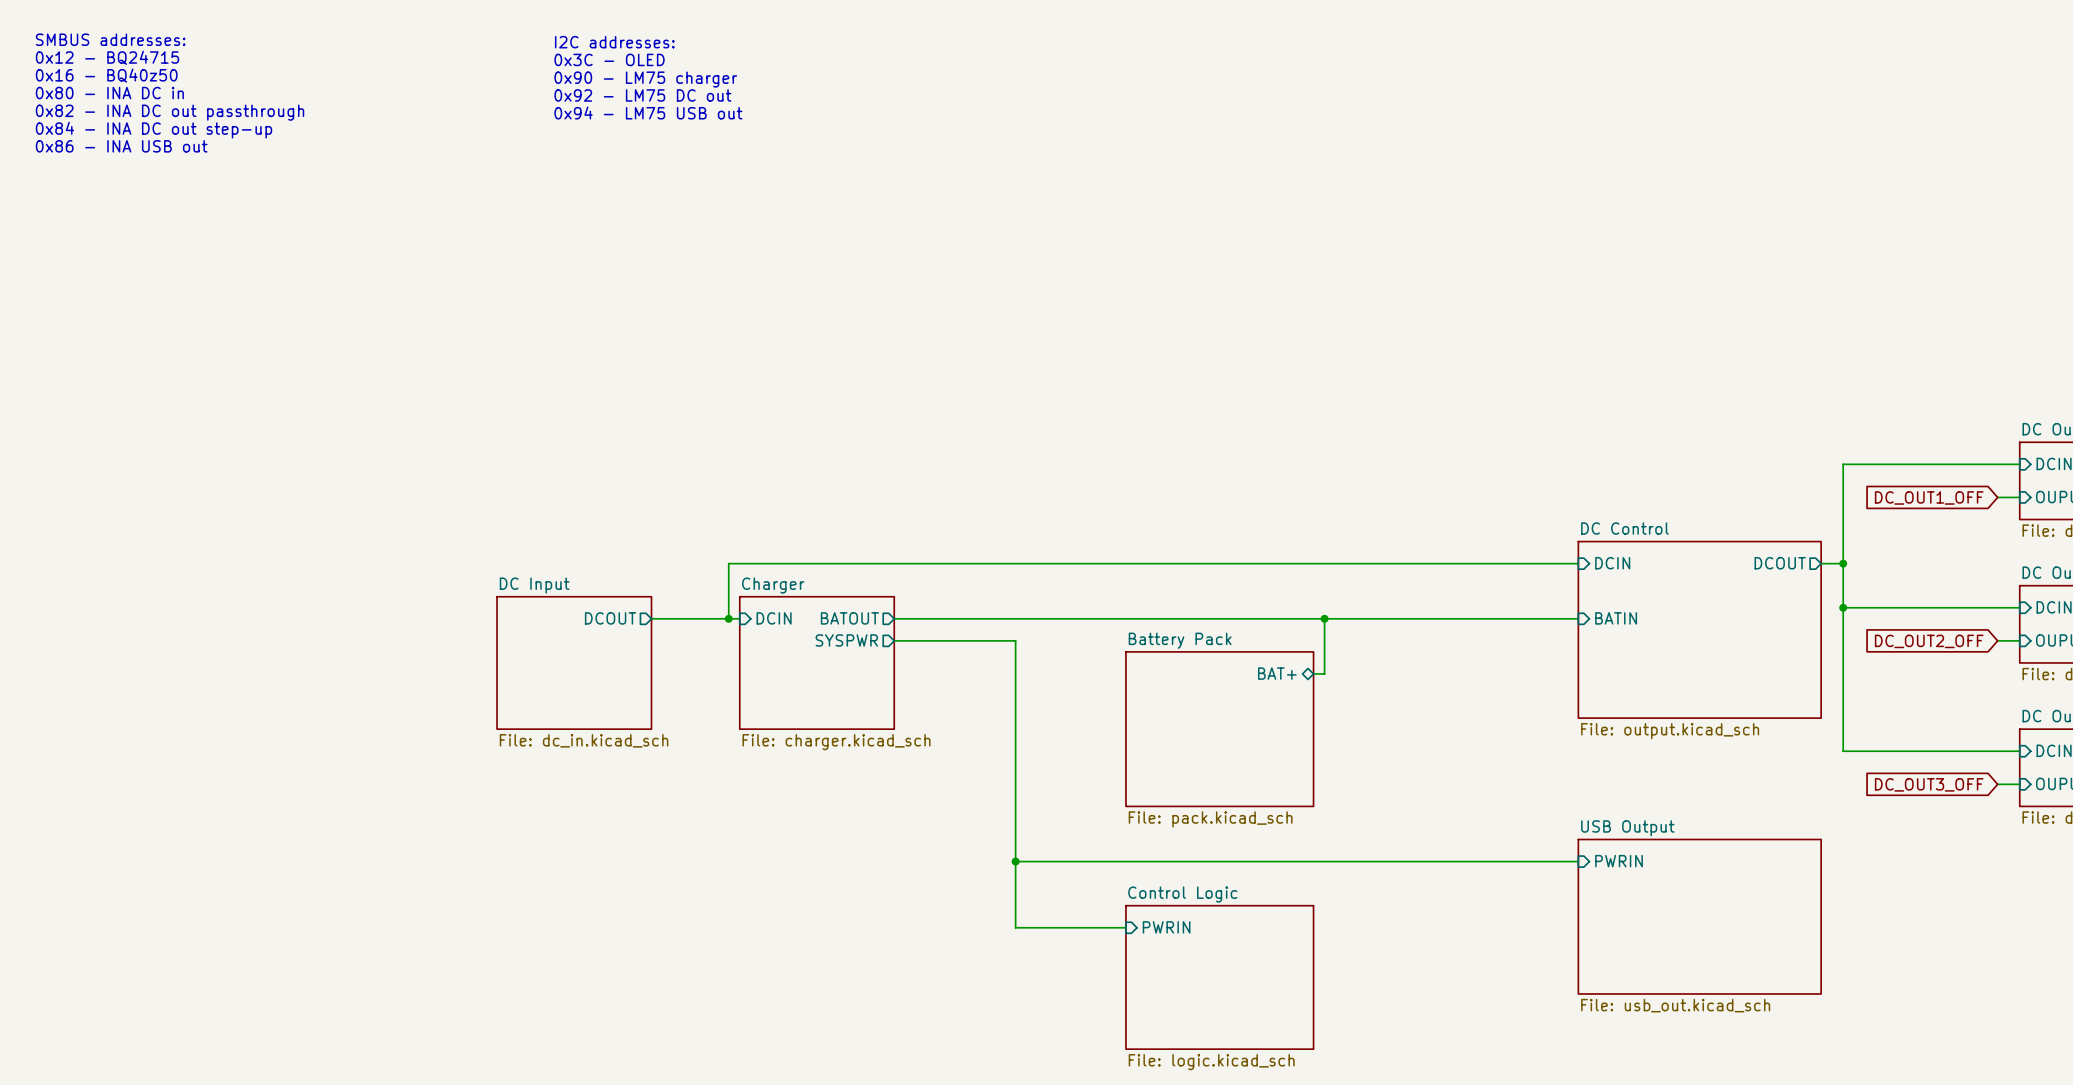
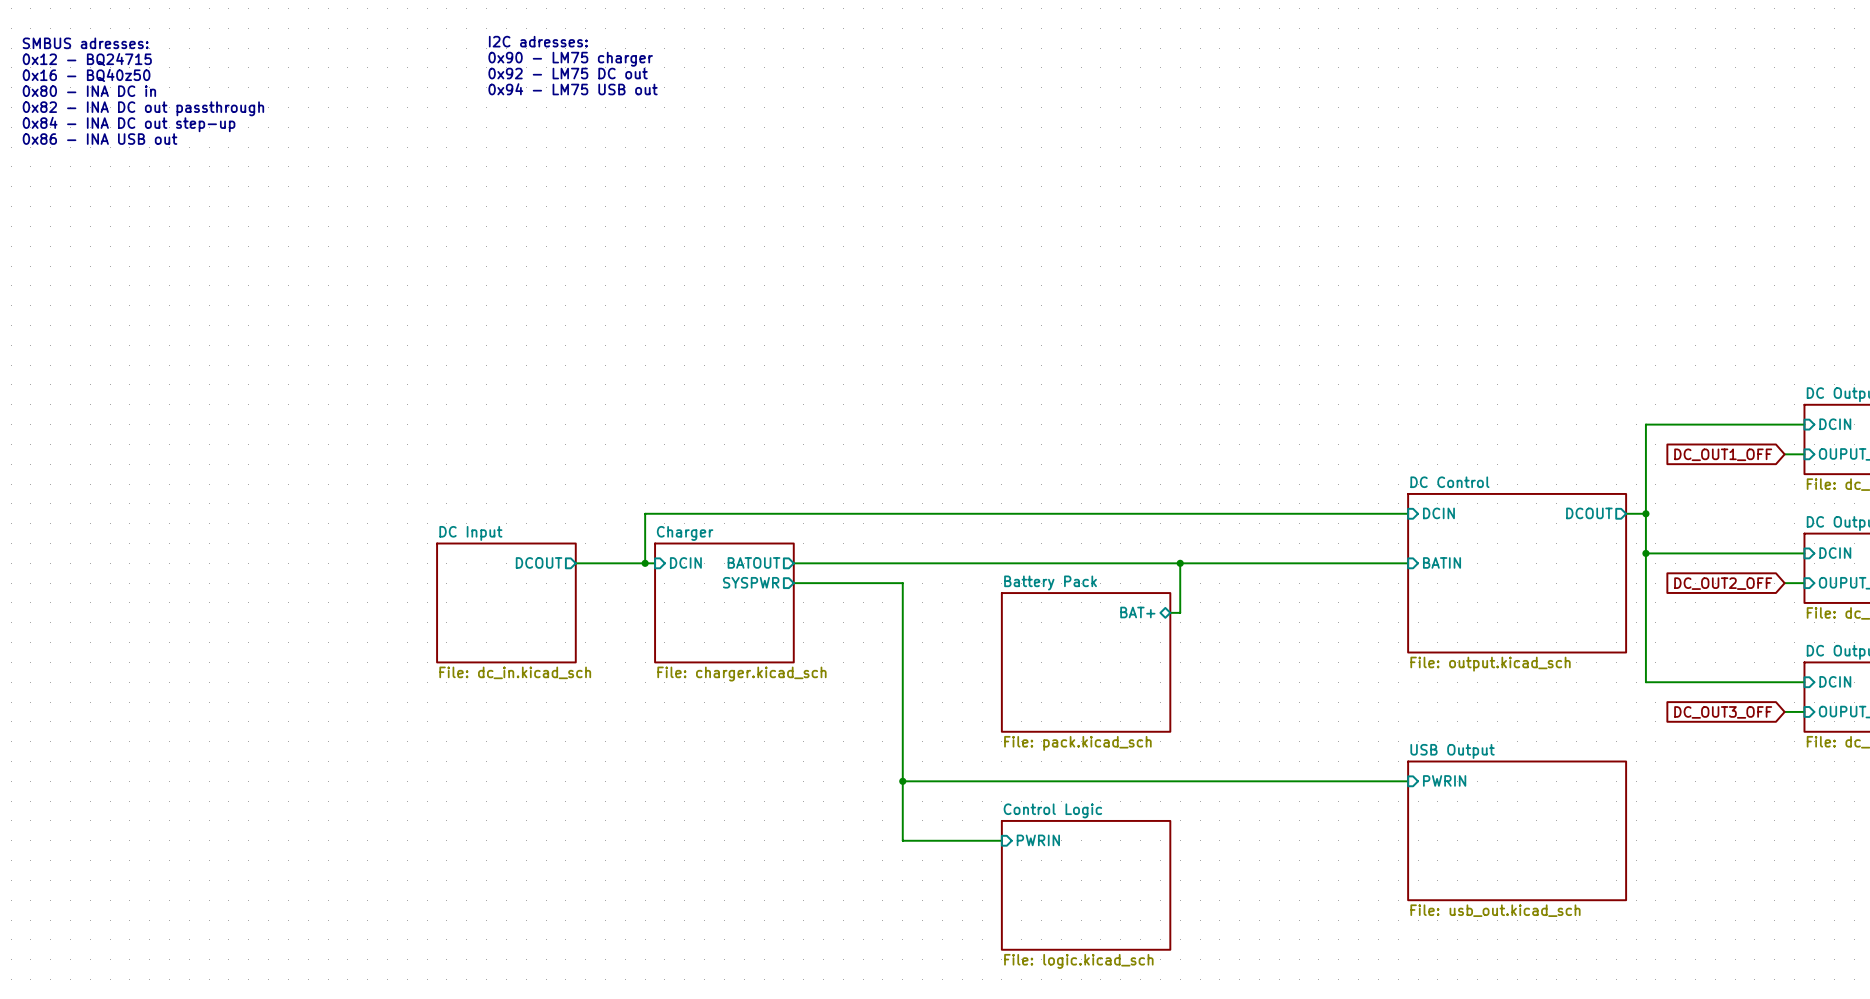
text: SMBUS addresses: (110, 39) -> SMBUS adresses: (85, 43)
text: I2C addresses: (614, 42) -> I2C adresses: (538, 41)
text: 0x3C - OLED (609, 59) -> 0x90 - LM75 charger (570, 59)
text: 0x90 - LM75 charger (645, 79) -> 0x92 - LM75 DC out (568, 73)
text: 0x92 - LM75 DC out (642, 95) -> 0x94 - LM75 USB out (573, 89)
text: 0x94 - LM75 USB out (648, 112) -> none

